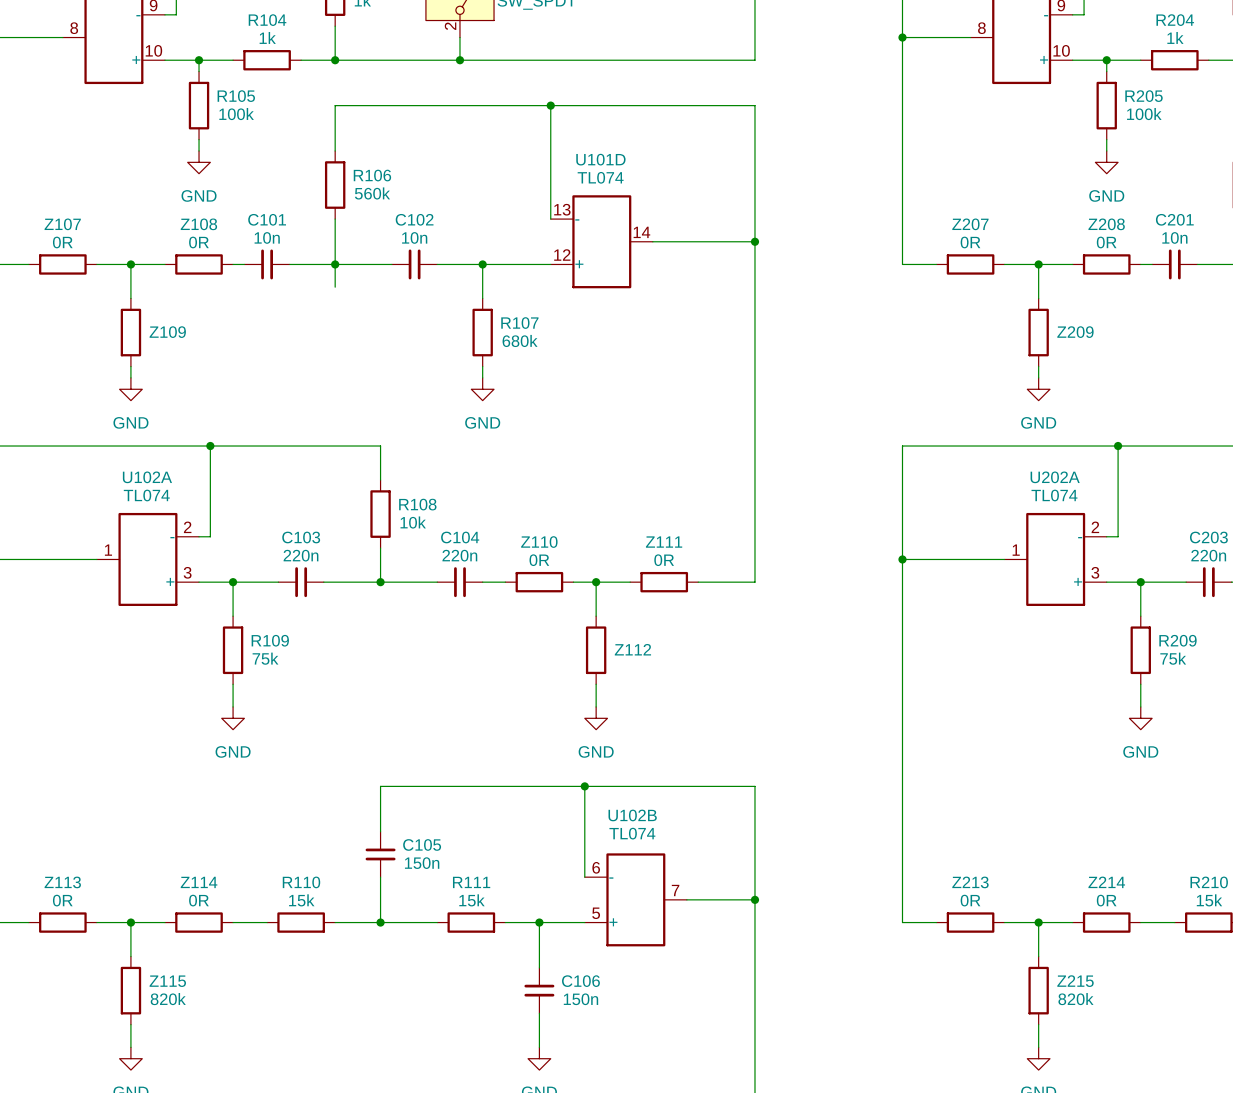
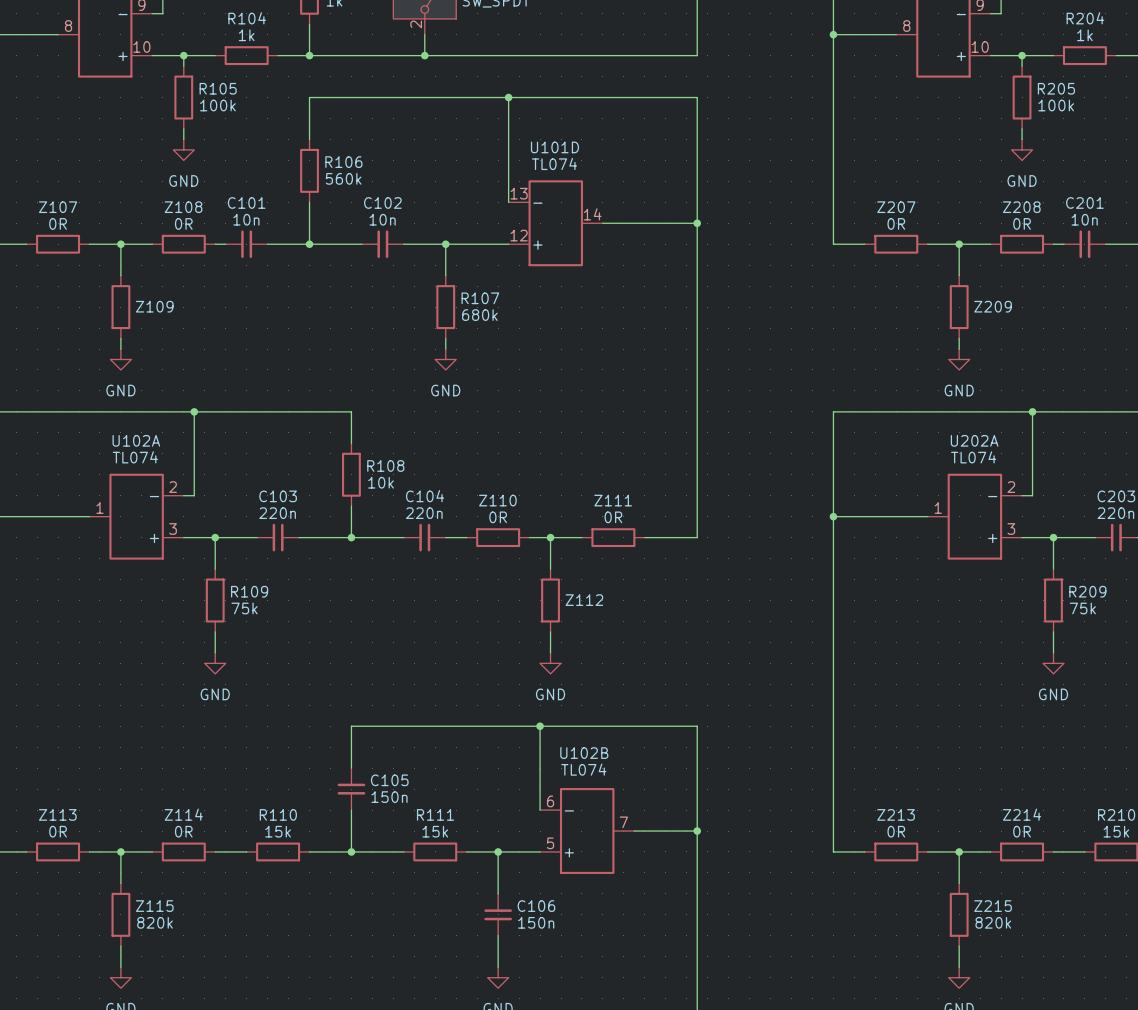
wire: (335, 264) (335, 287) -> none

